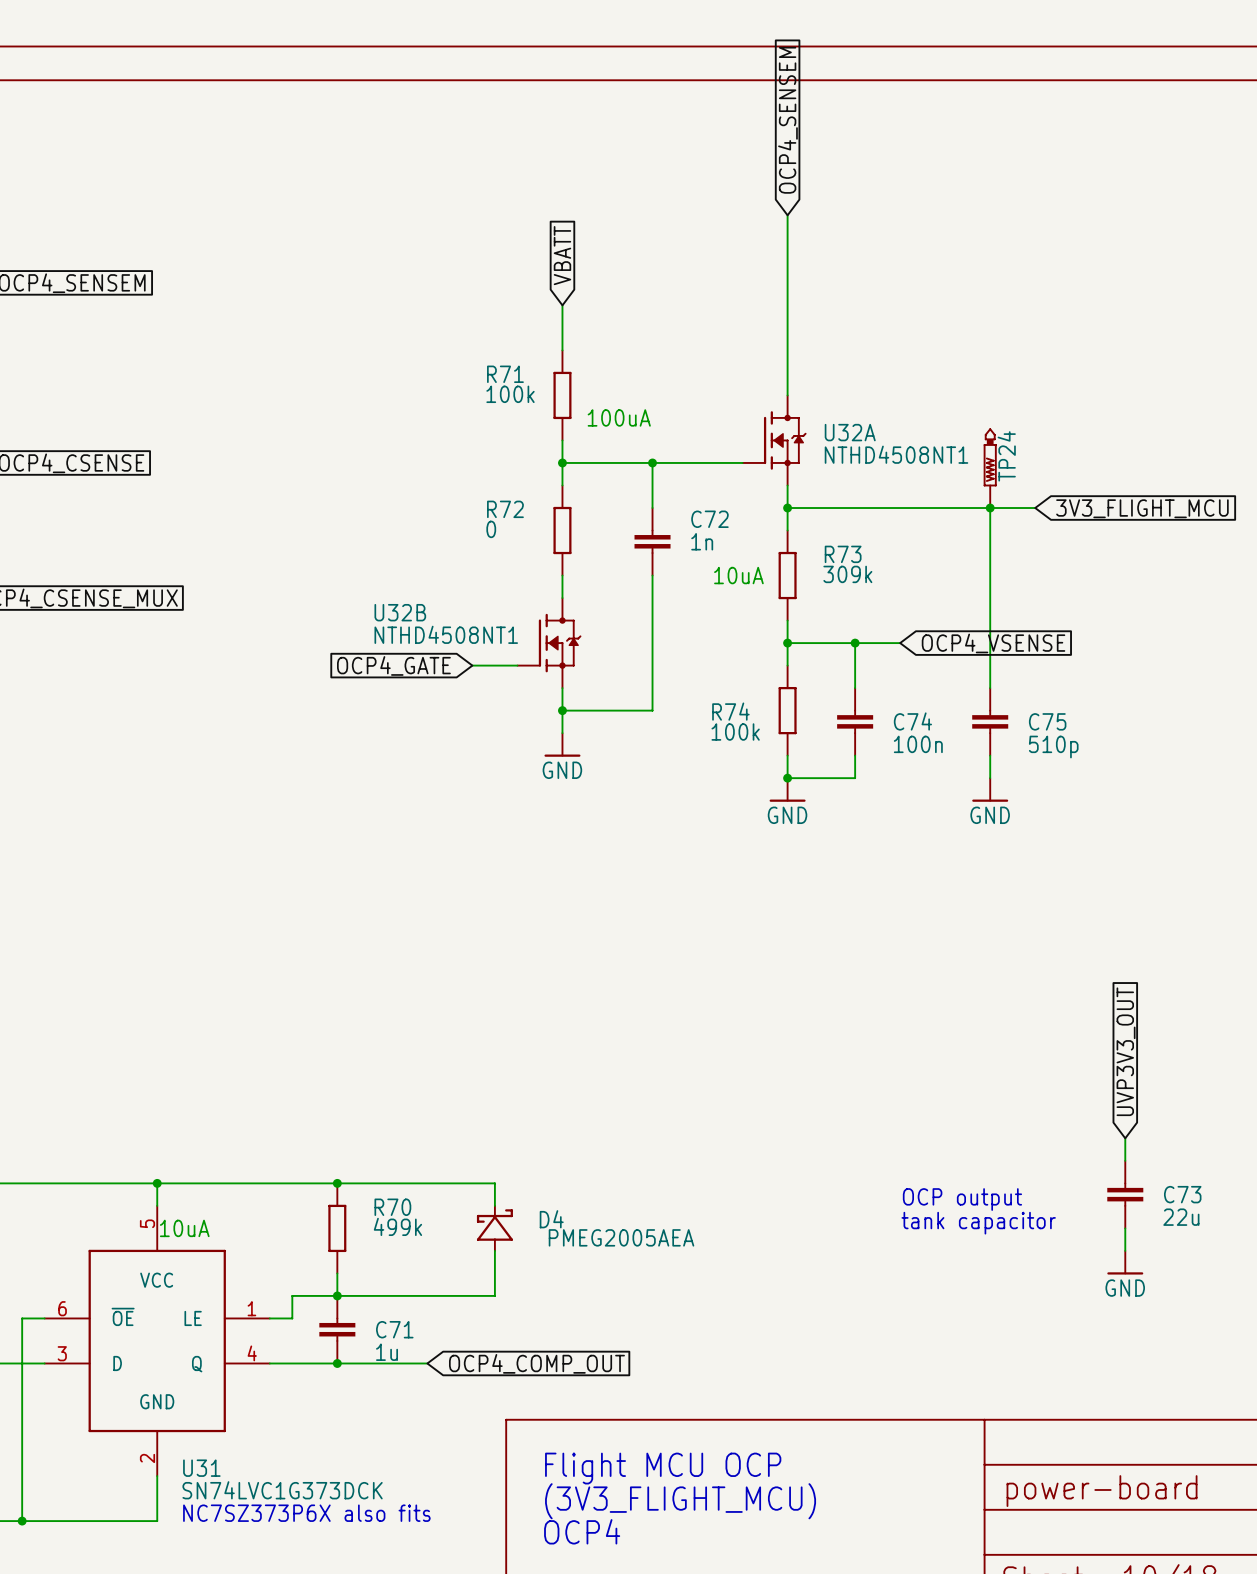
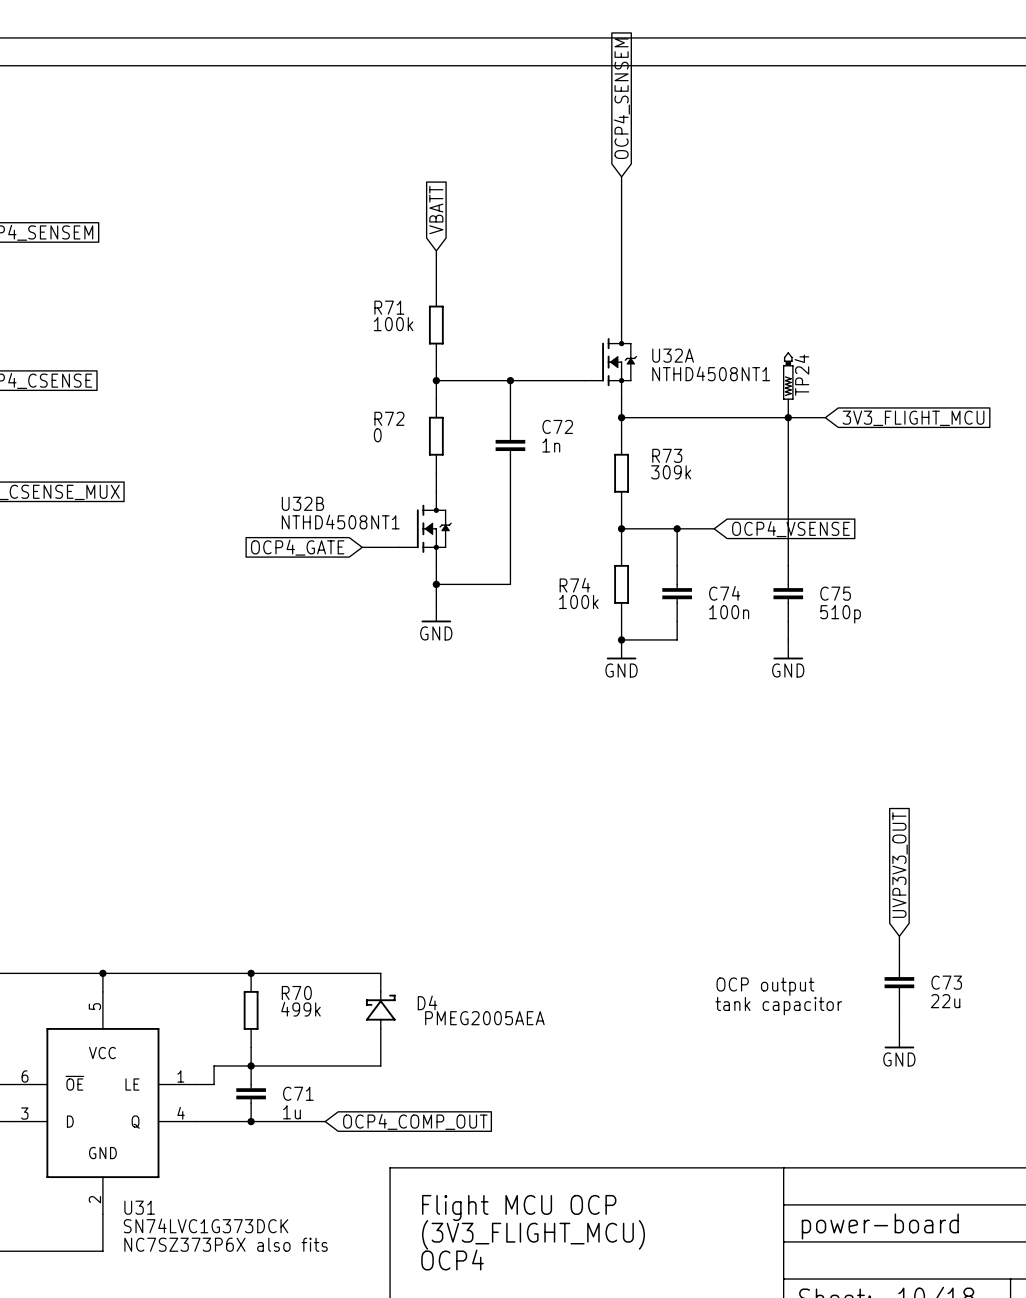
text: 100uA (619, 417) -> none
text: 10uA (738, 575) -> none
text: 10uA (184, 1228) -> none

